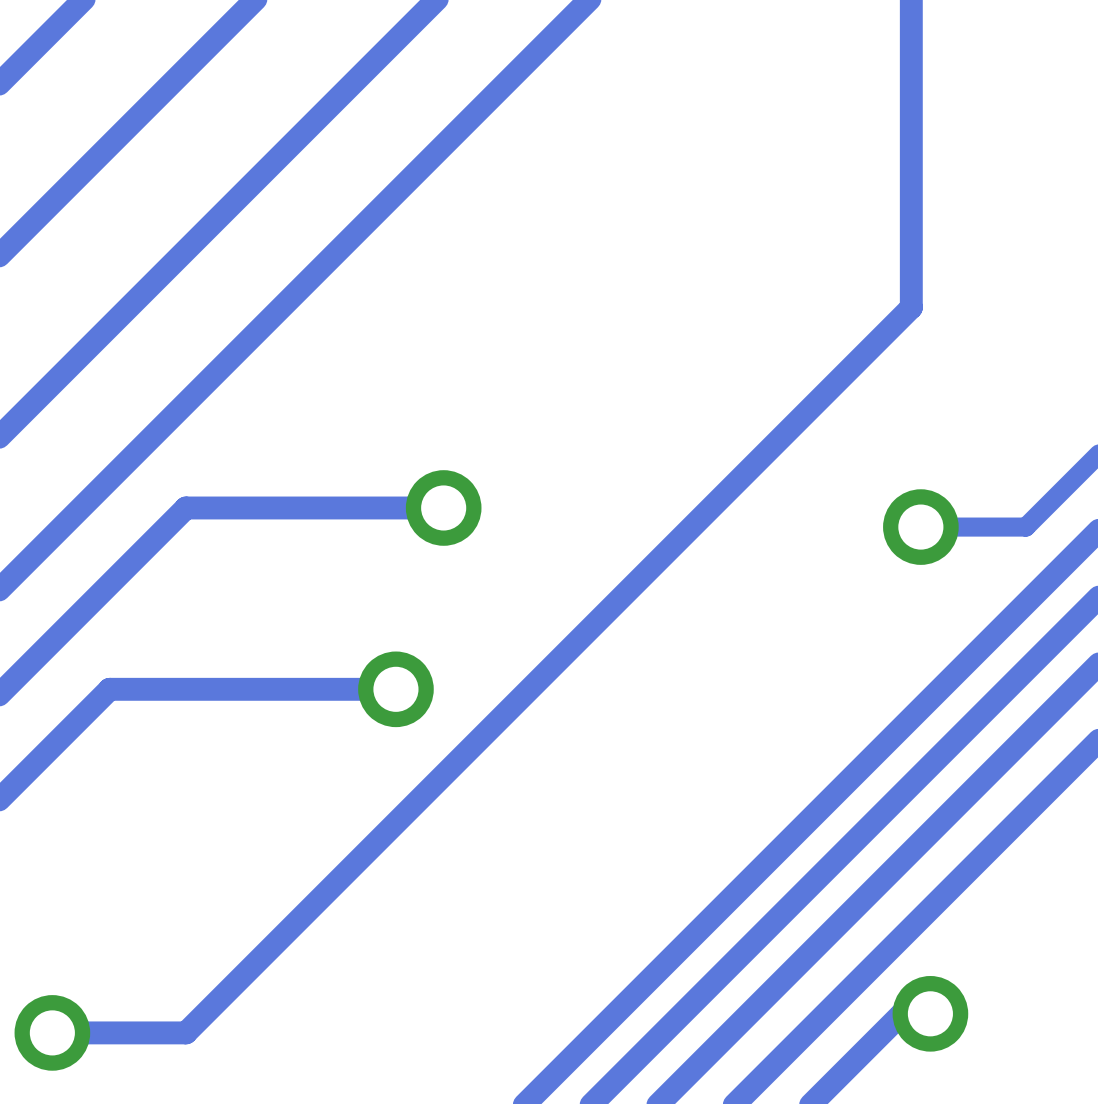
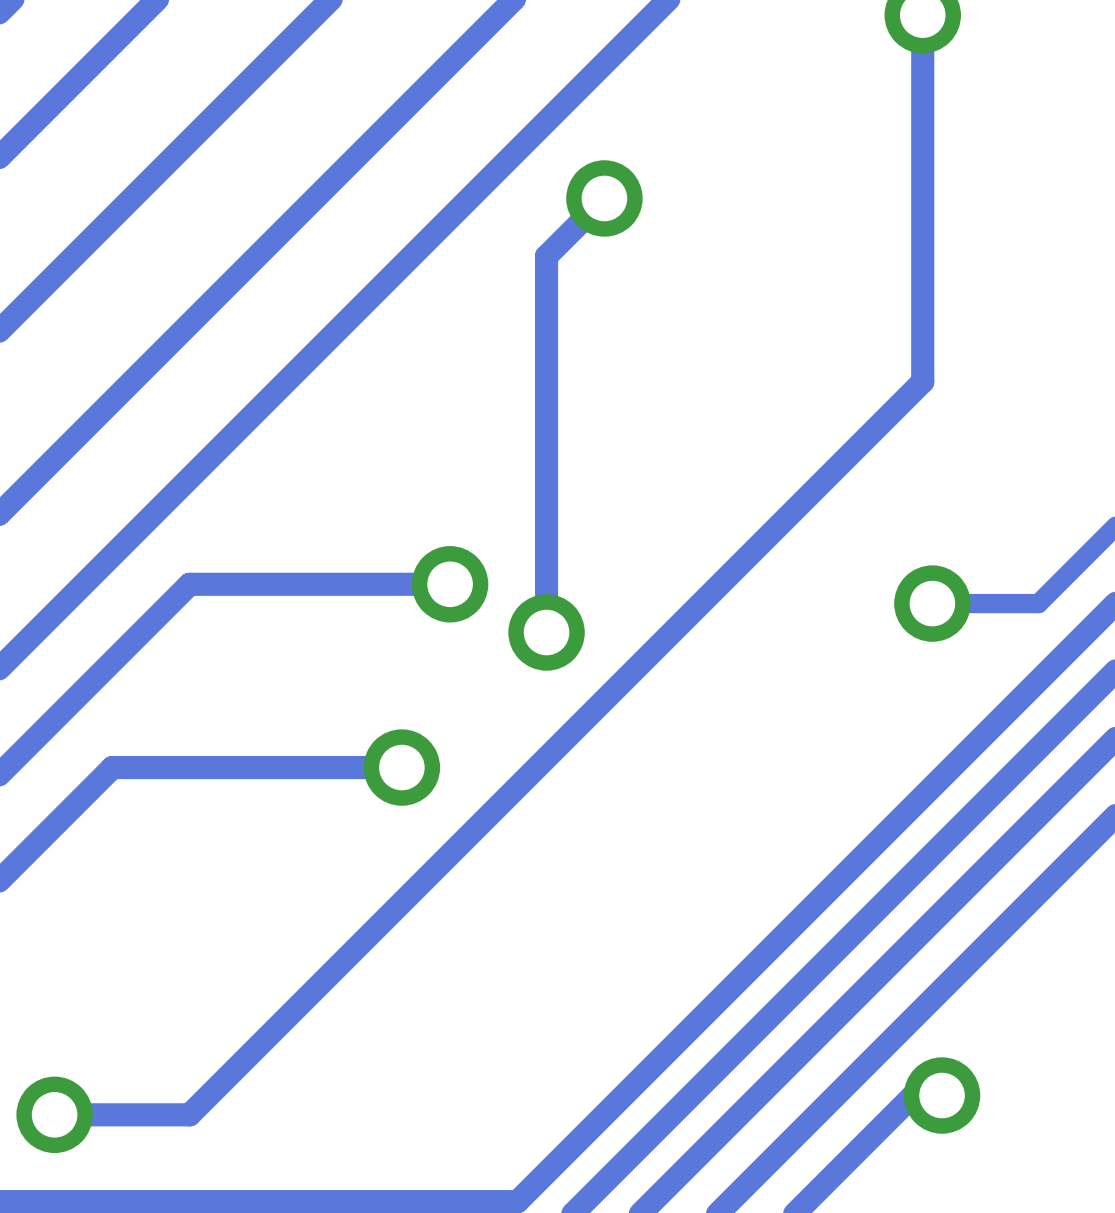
track: none -> (604, 198) (546, 256) (546, 632)
via: none -> (604, 198)
via: none -> (546, 632)

